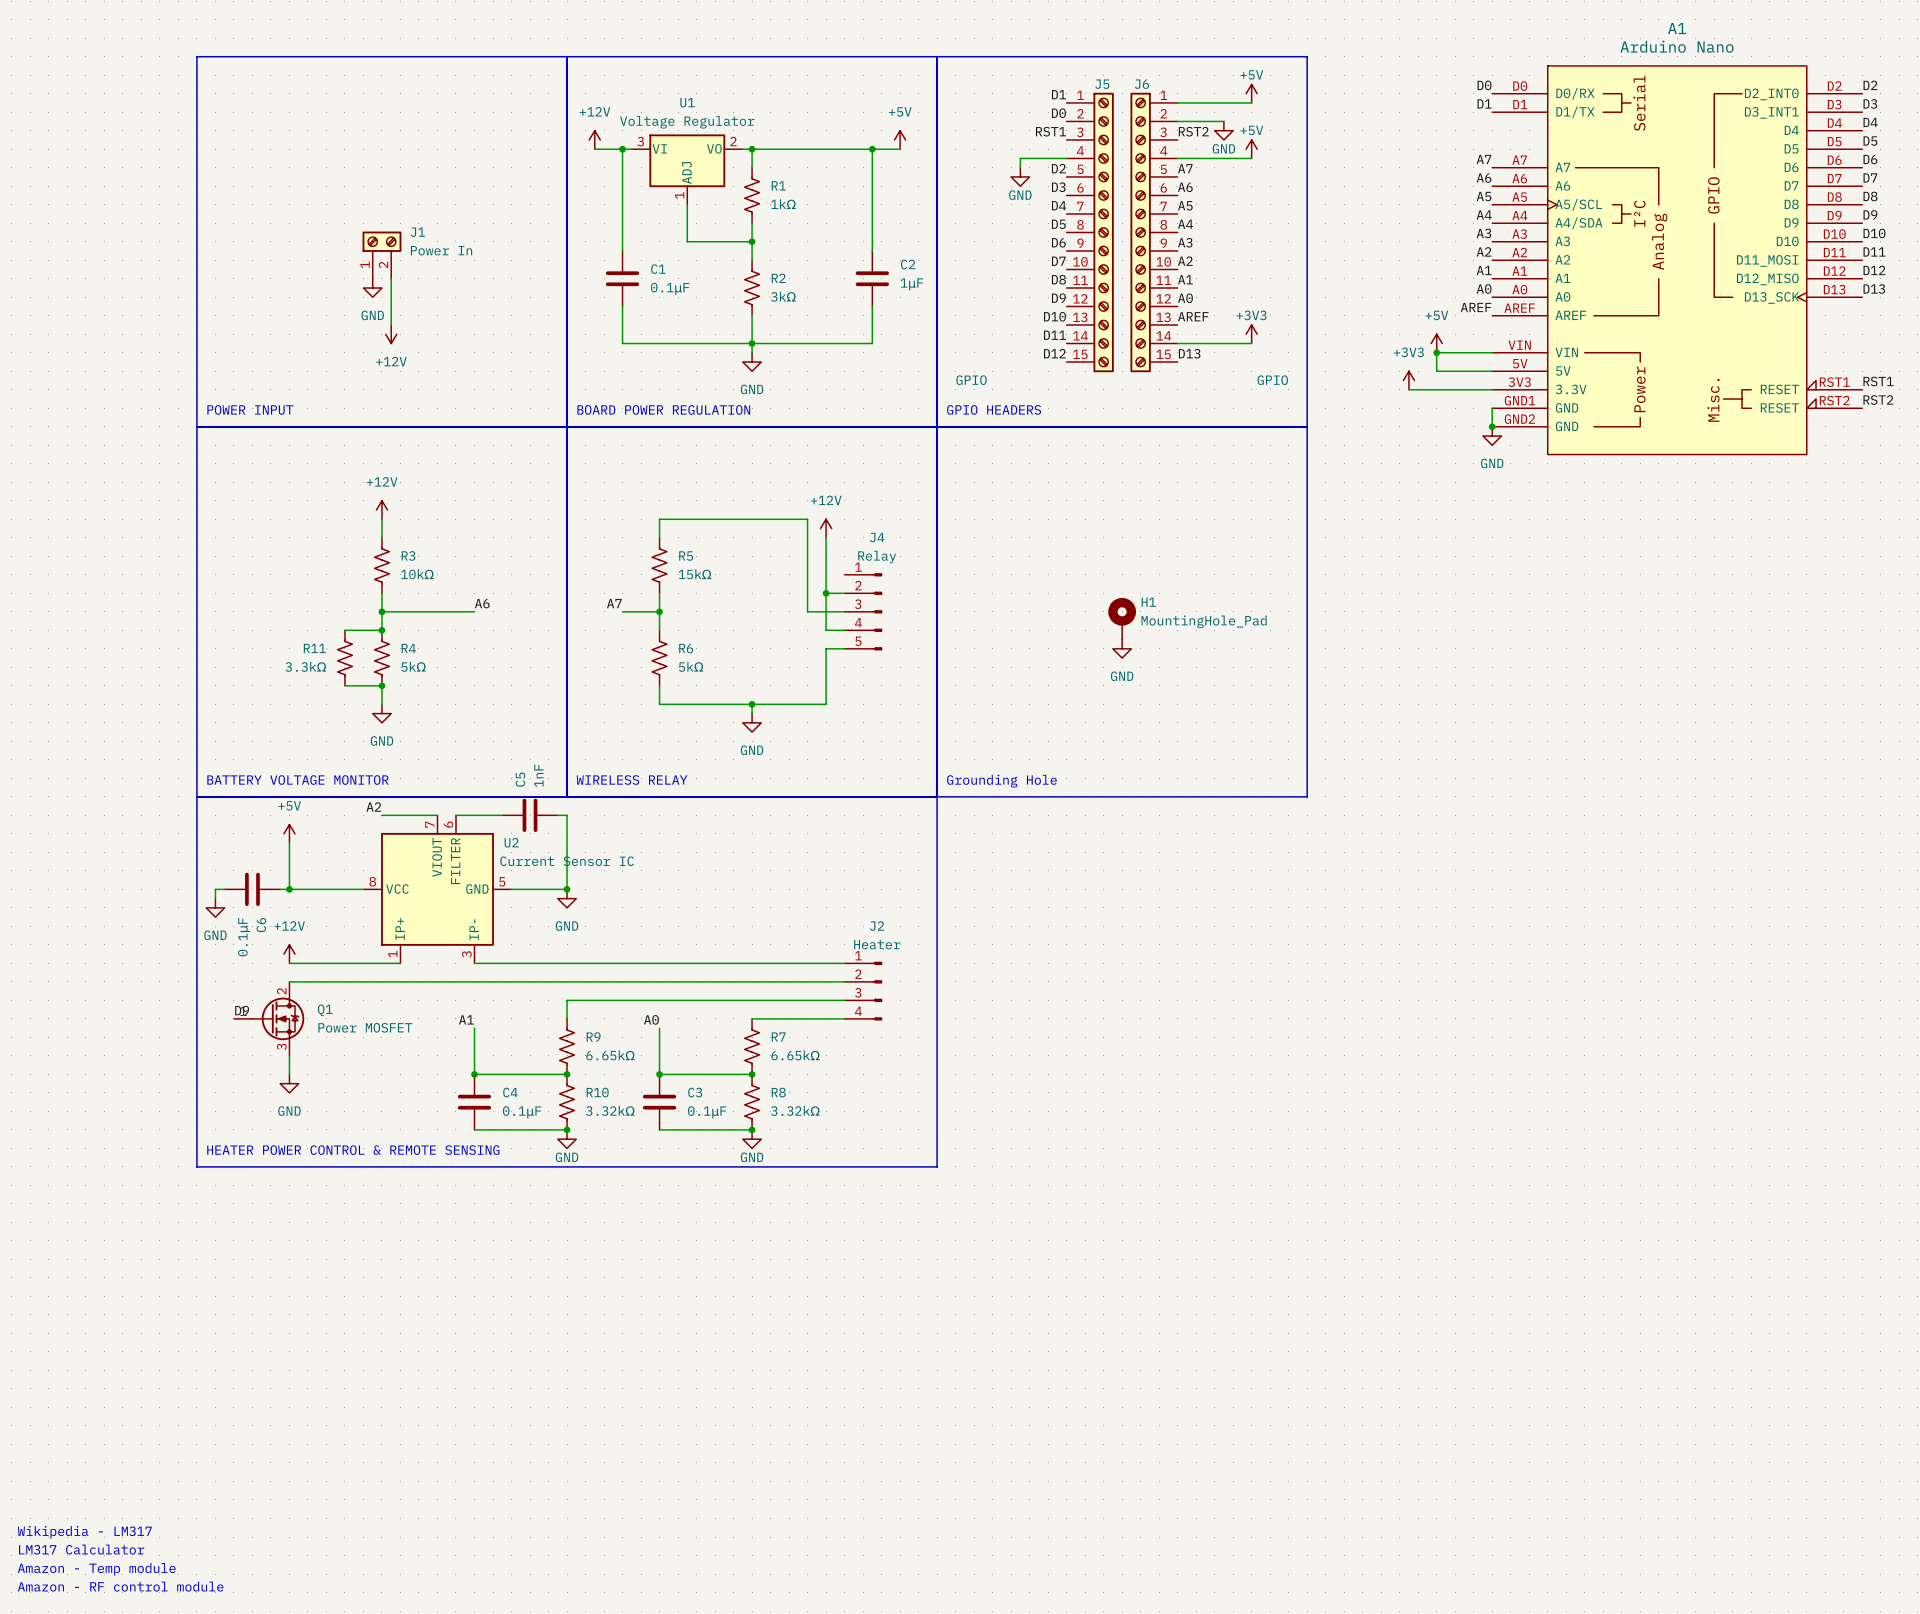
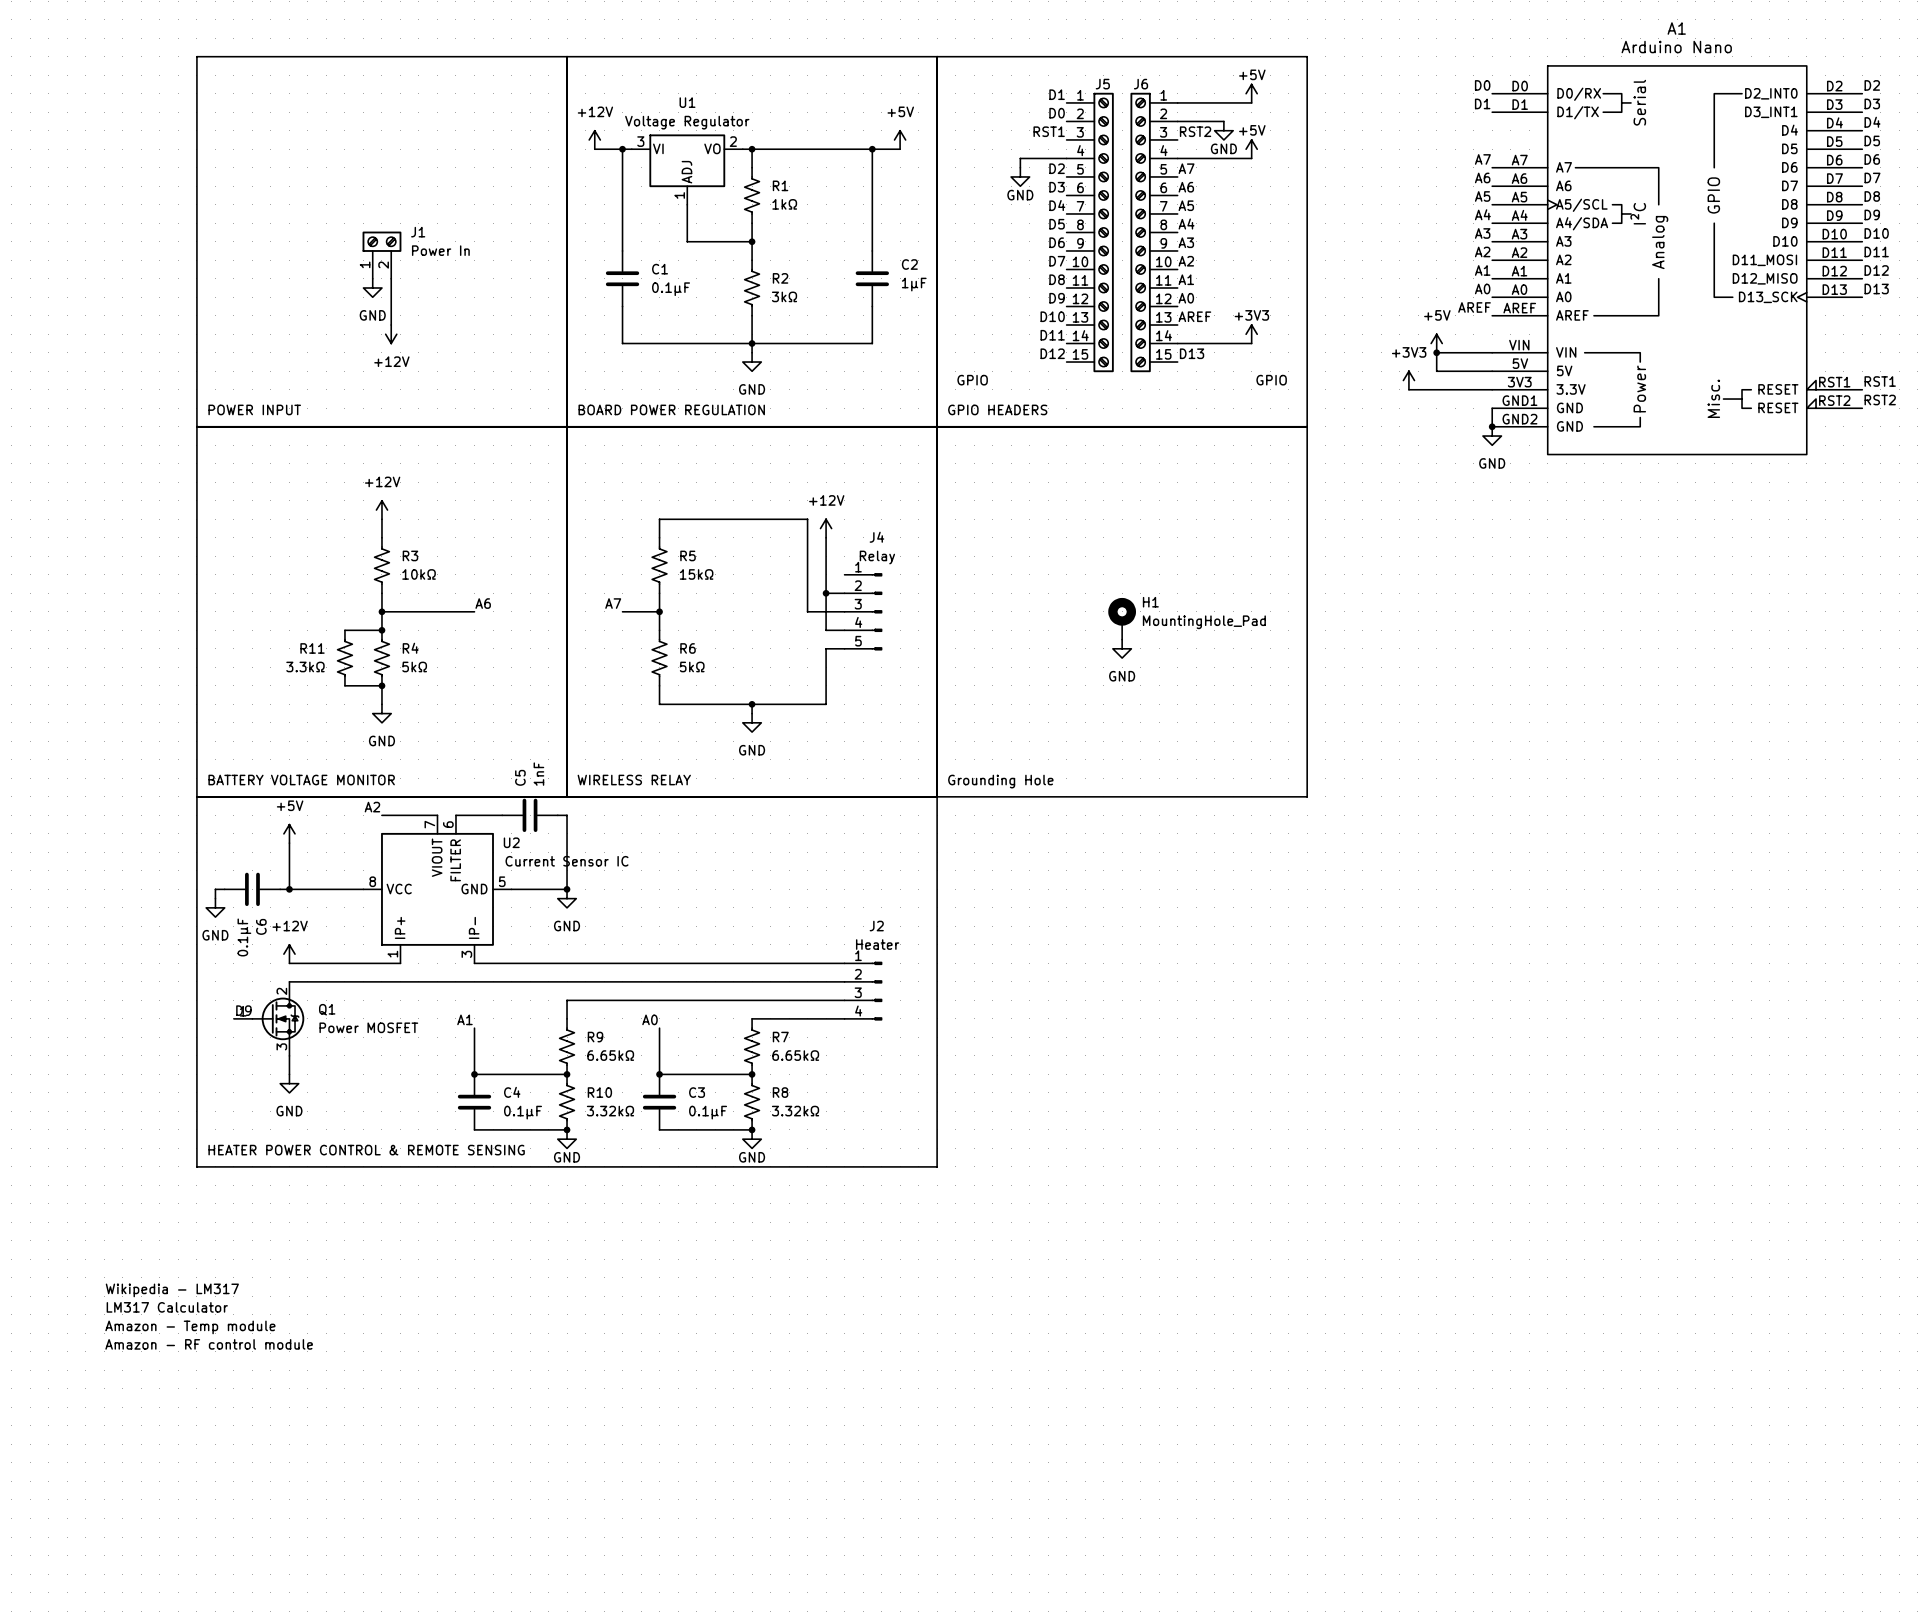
text: none -> Wikipedia - LM317 (172, 1290)
text: none -> LM317 Calculator (167, 1307)
text: none -> Amazon - Temp module (190, 1327)
text: none -> Amazon - RF control module (209, 1344)
text: Wikipedia - LM317 (84, 1532) -> none
text: LM317 Calculator (81, 1549) -> none
text: Amazon - Temp module (96, 1569) -> none
text: Amazon - RF control module (120, 1586) -> none

